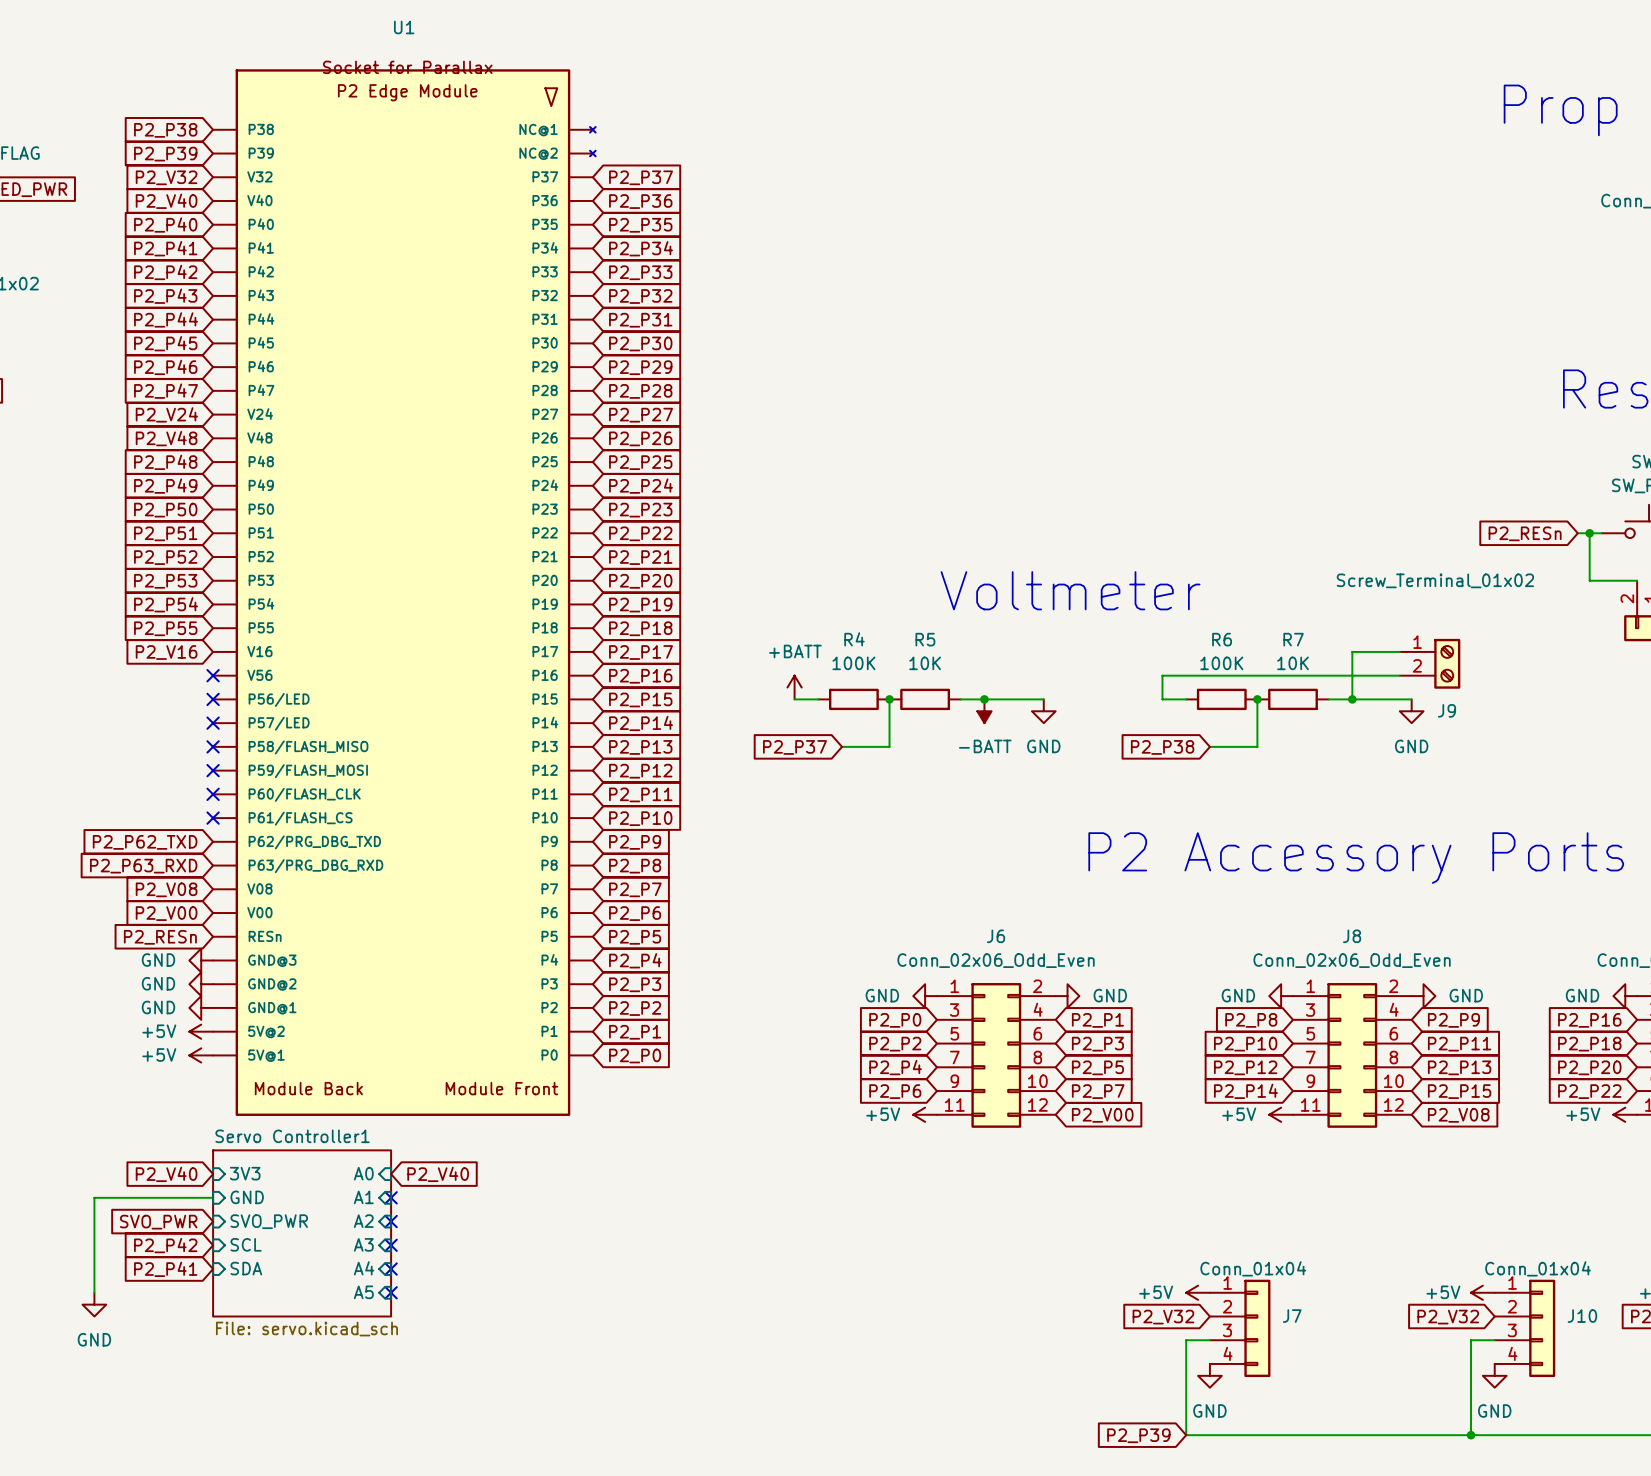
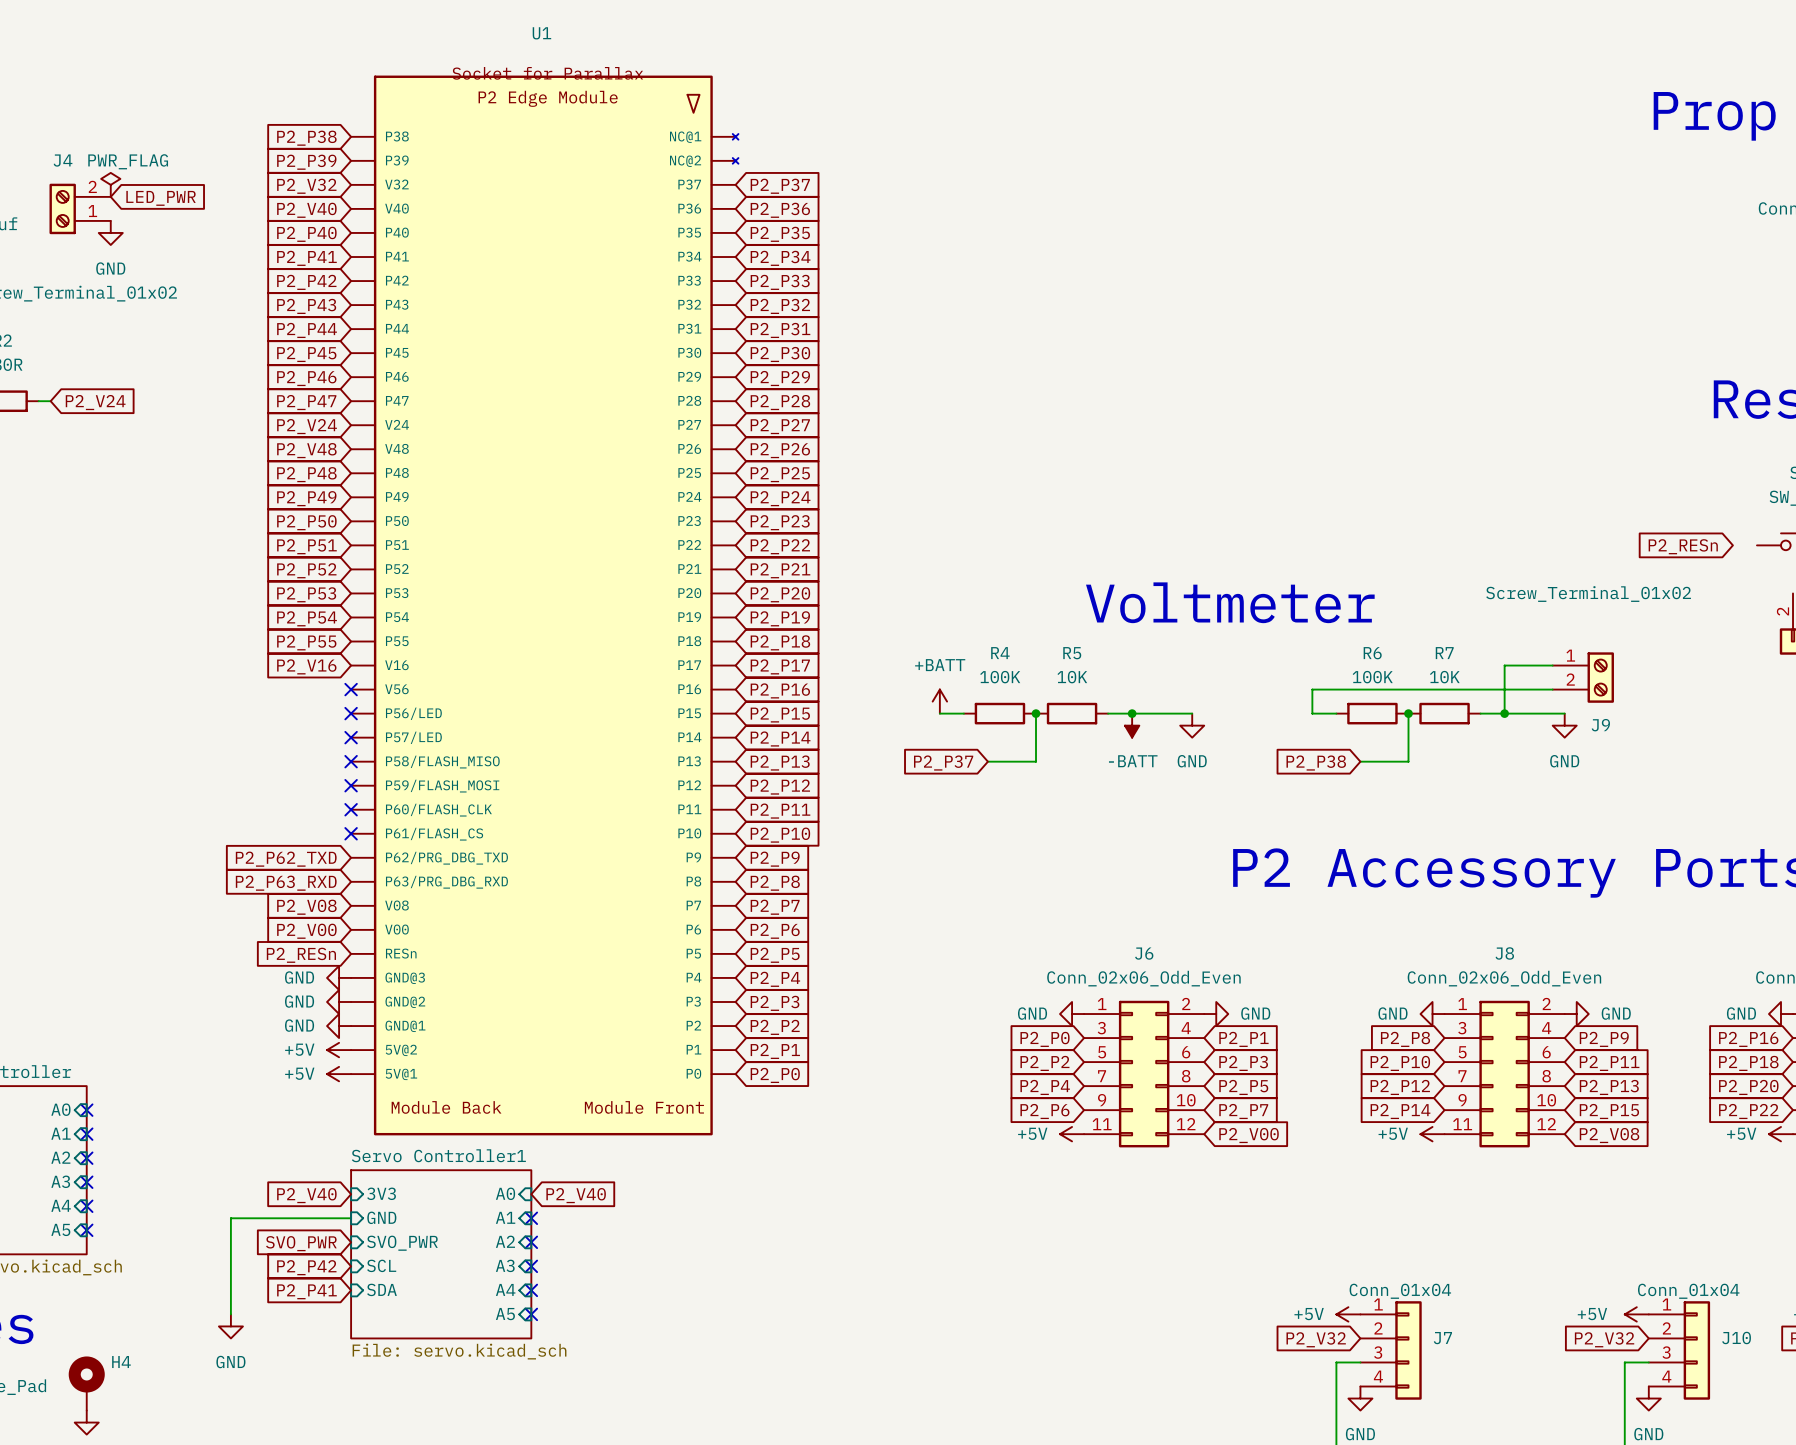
wire: (1577, 533) (1601, 533) -> none
wire: (1589, 533) (1589, 580) (1637, 580) -> none
junction: (1589, 533) -> none

